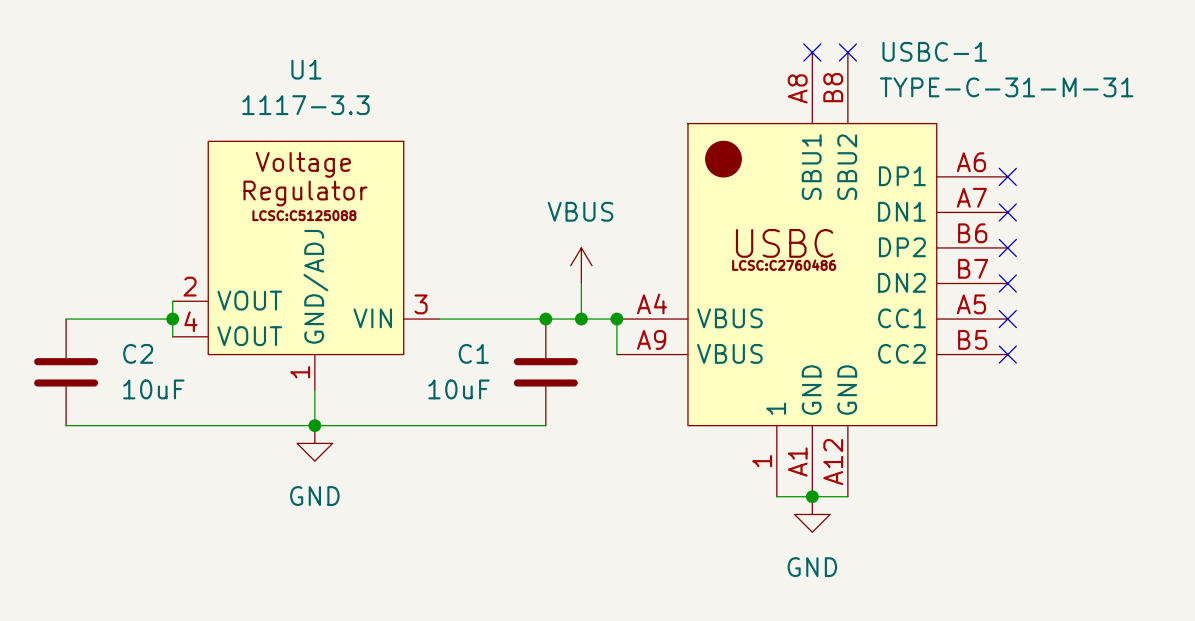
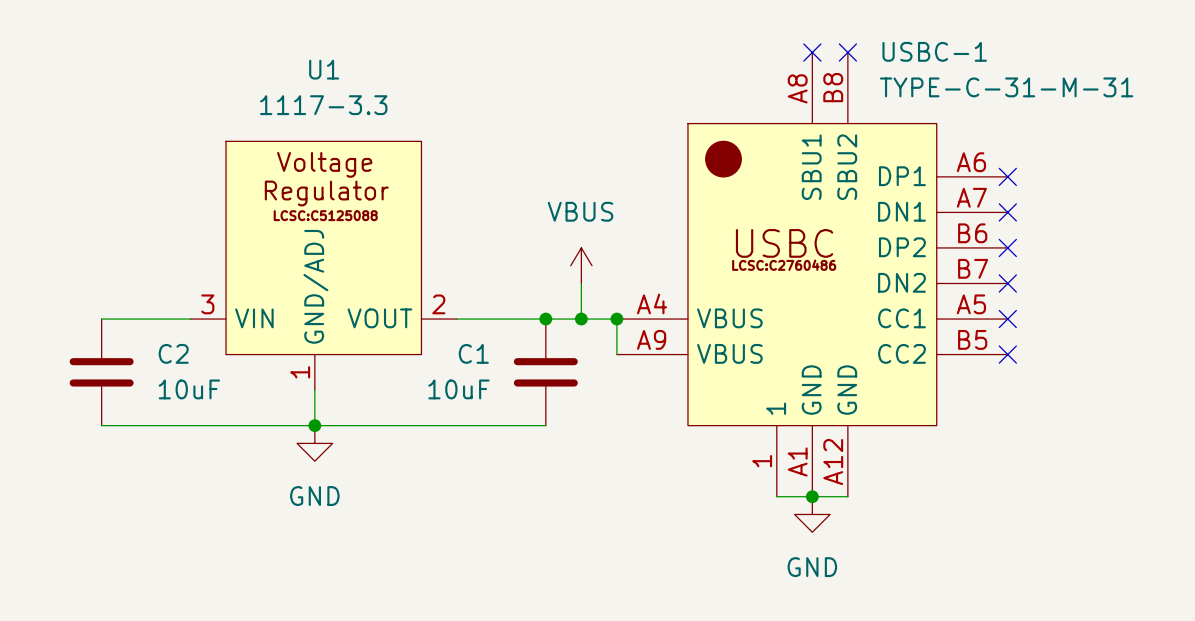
U1 symbol: [172, 141, 440, 391] -> [190, 141, 457, 391]
wire: (172, 301) (172, 336) -> none
wire: (66, 319) (101, 319) -> none
junction: (172, 319) -> none
C2 position: (66, 372) -> (101, 372)
wire: (66, 425) (101, 425) -> none

